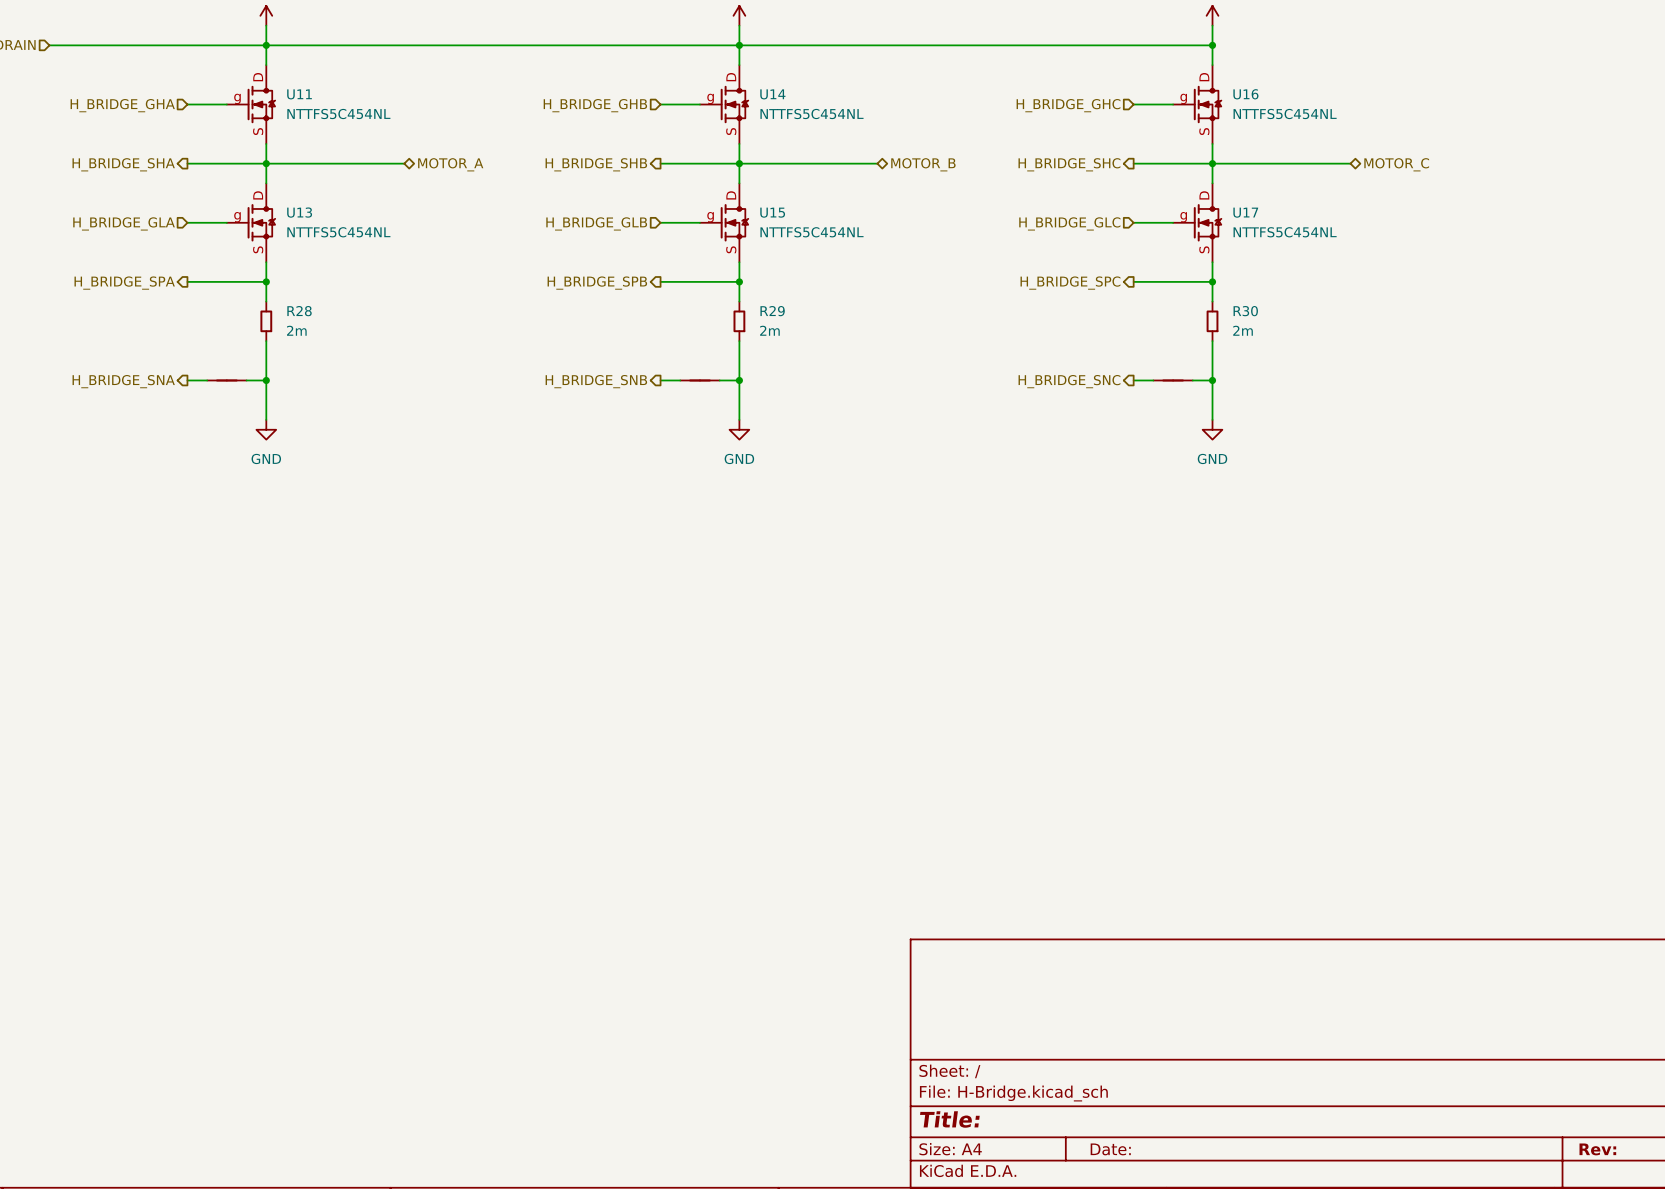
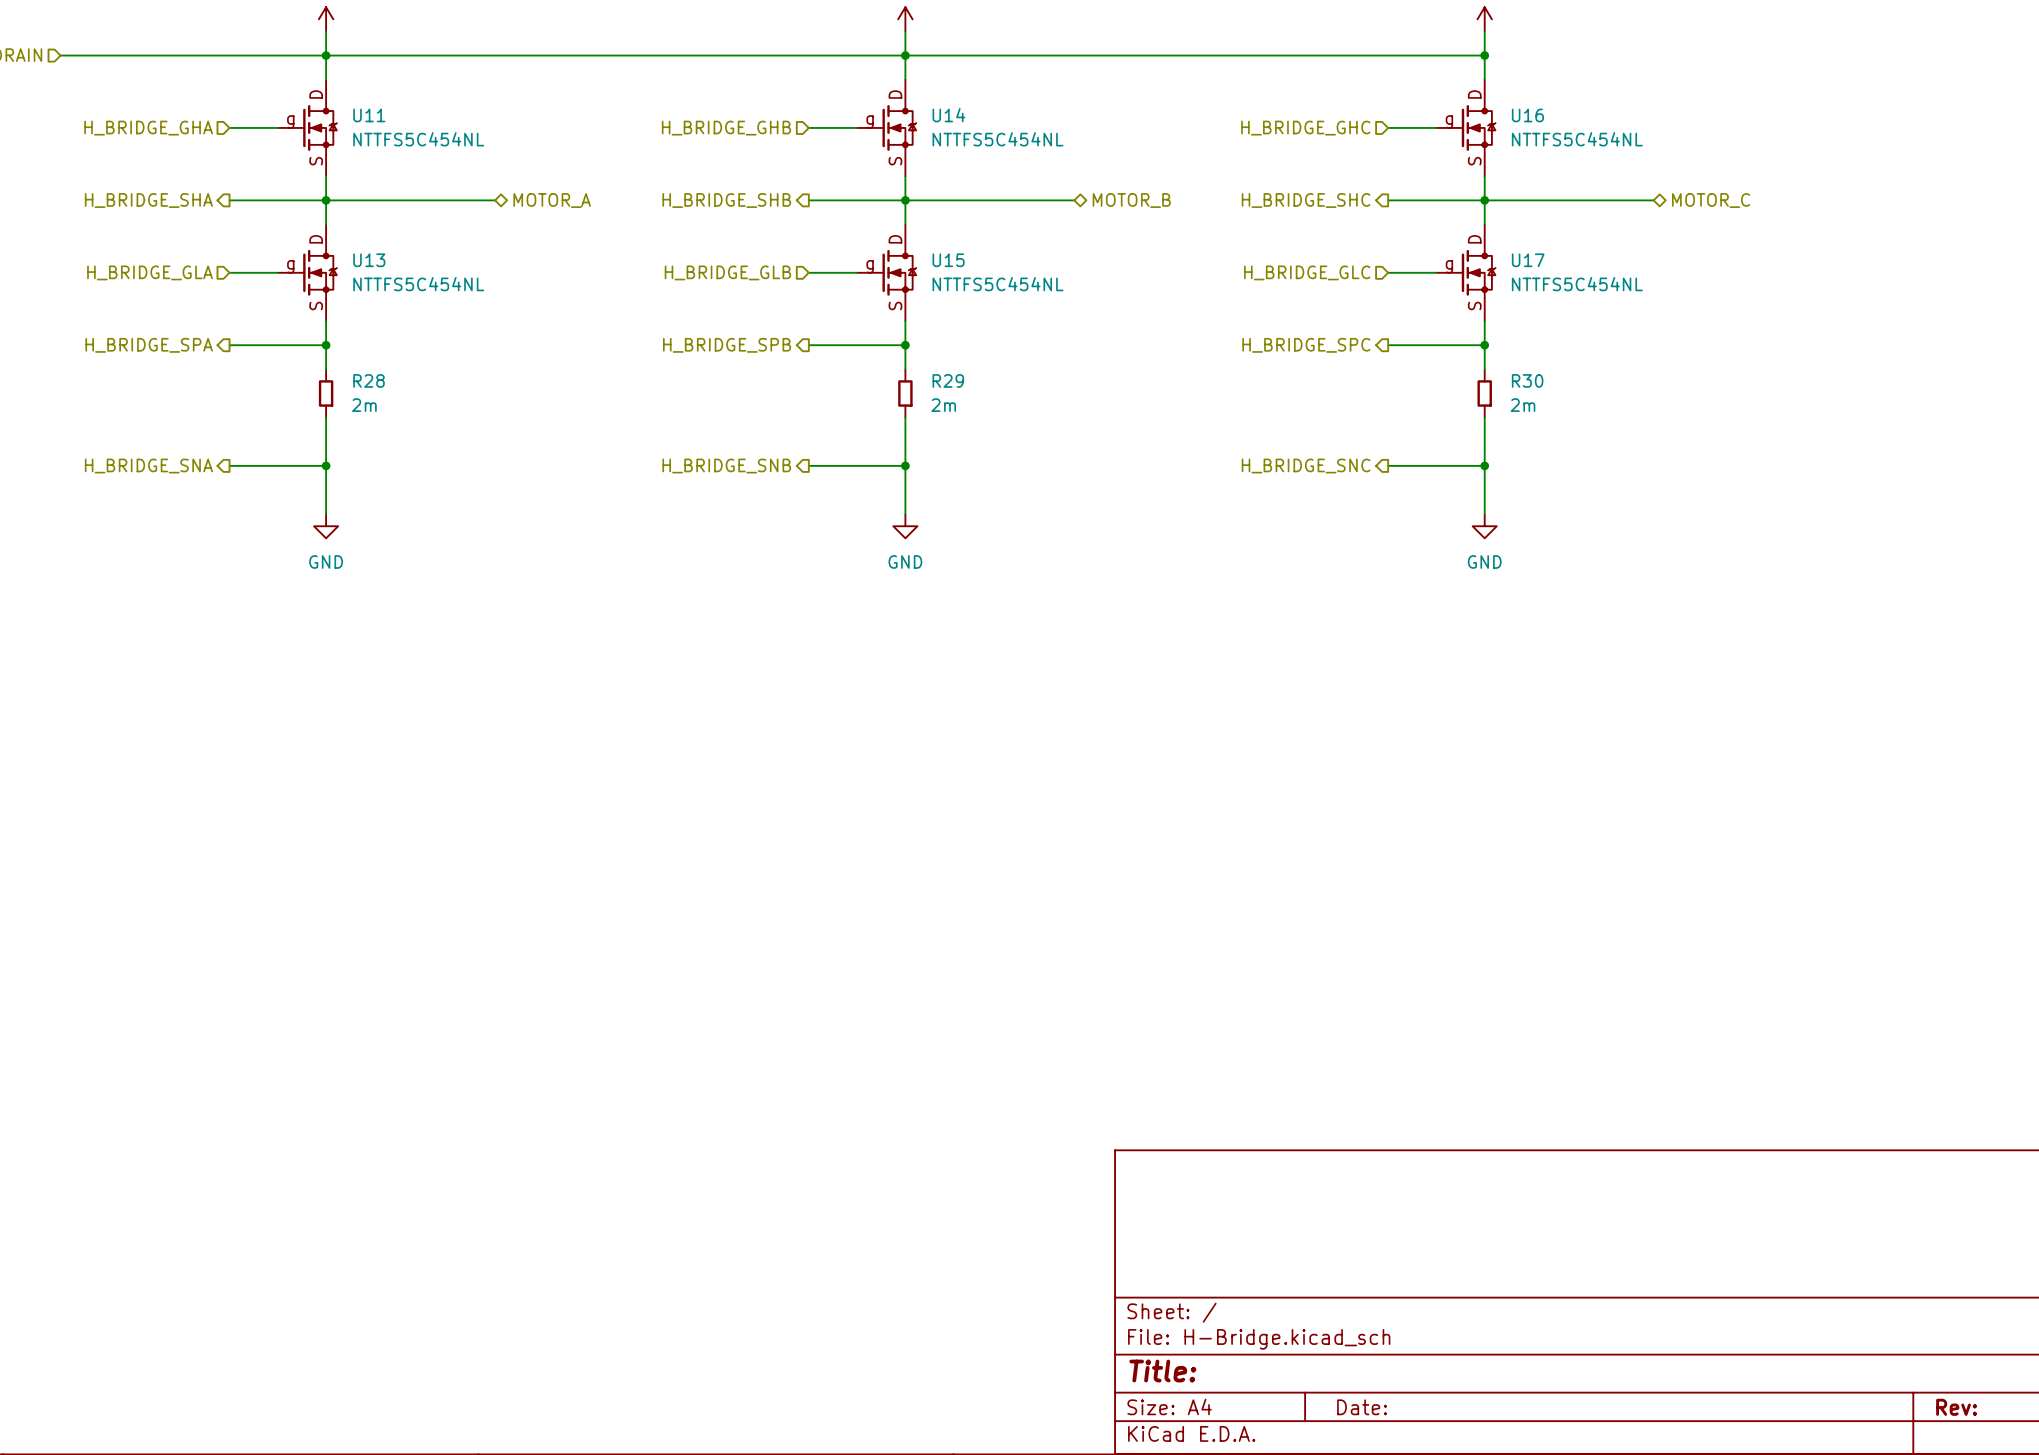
part: (226, 380) -> none
part: (699, 380) -> none
part: (1173, 380) -> none

